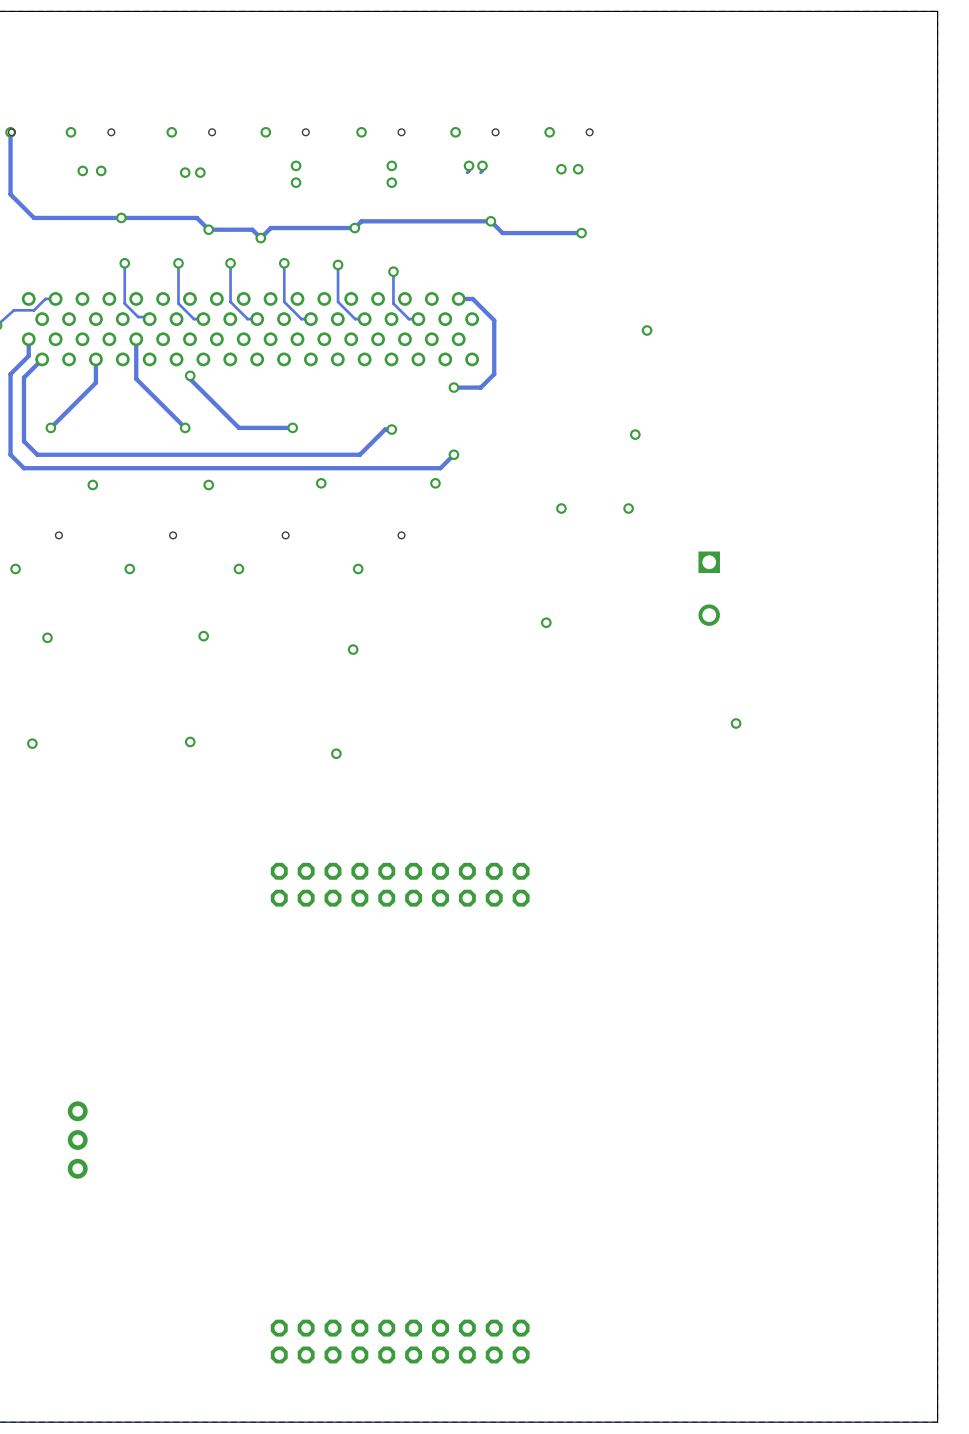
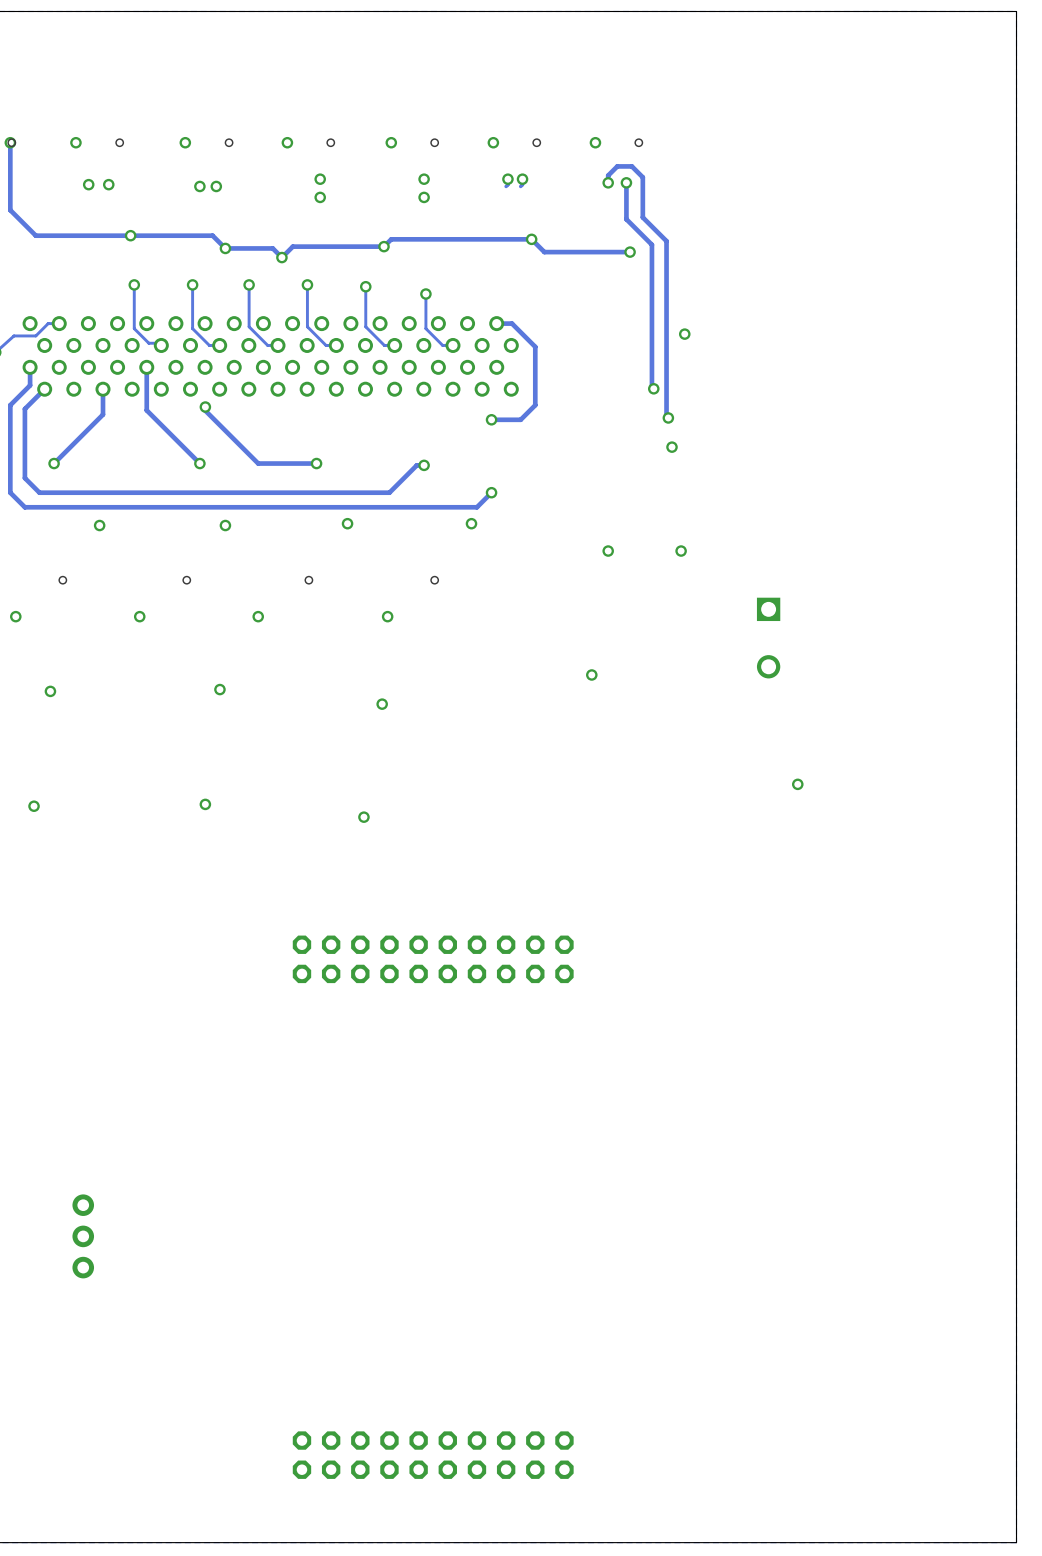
track: none -> (608, 182) (608, 175) (617, 166) (631, 166) (642, 177) (642, 217) (666, 241) (666, 416) (668, 417)
track: none -> (626, 182) (626, 219) (651, 244) (651, 386) (653, 388)
via: none -> (684, 334)
via: (647, 330) -> none
via: none -> (653, 388)
via: none -> (668, 417)
via: none -> (672, 447)
via: (635, 434) -> none

